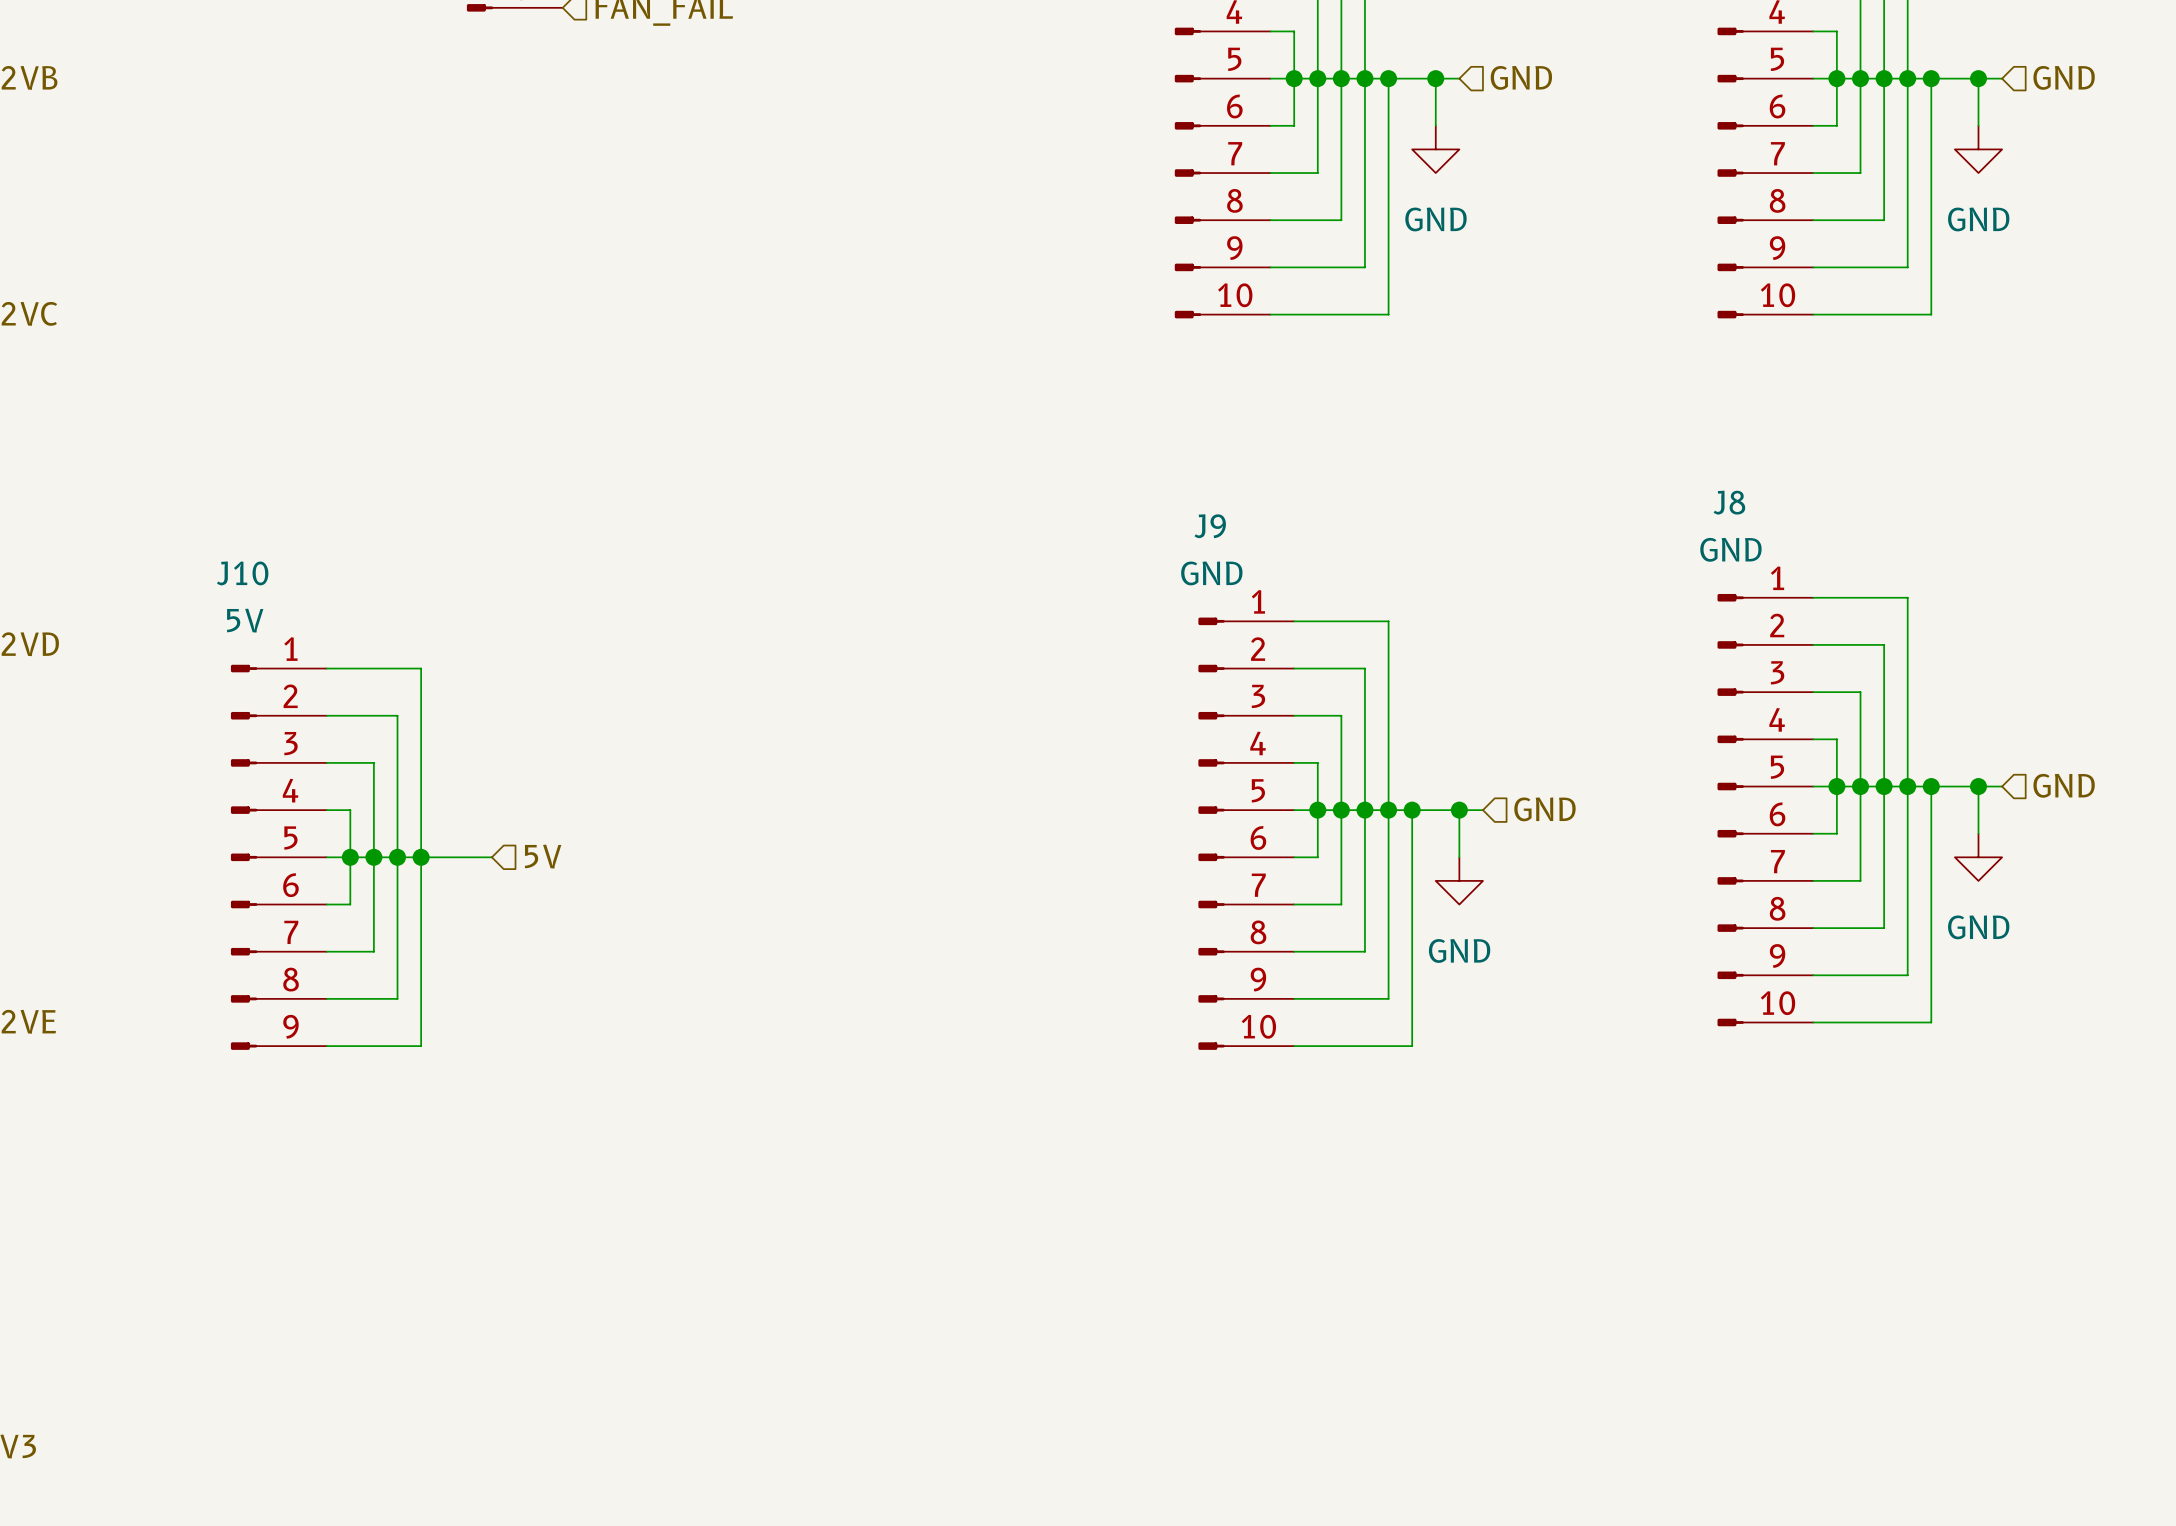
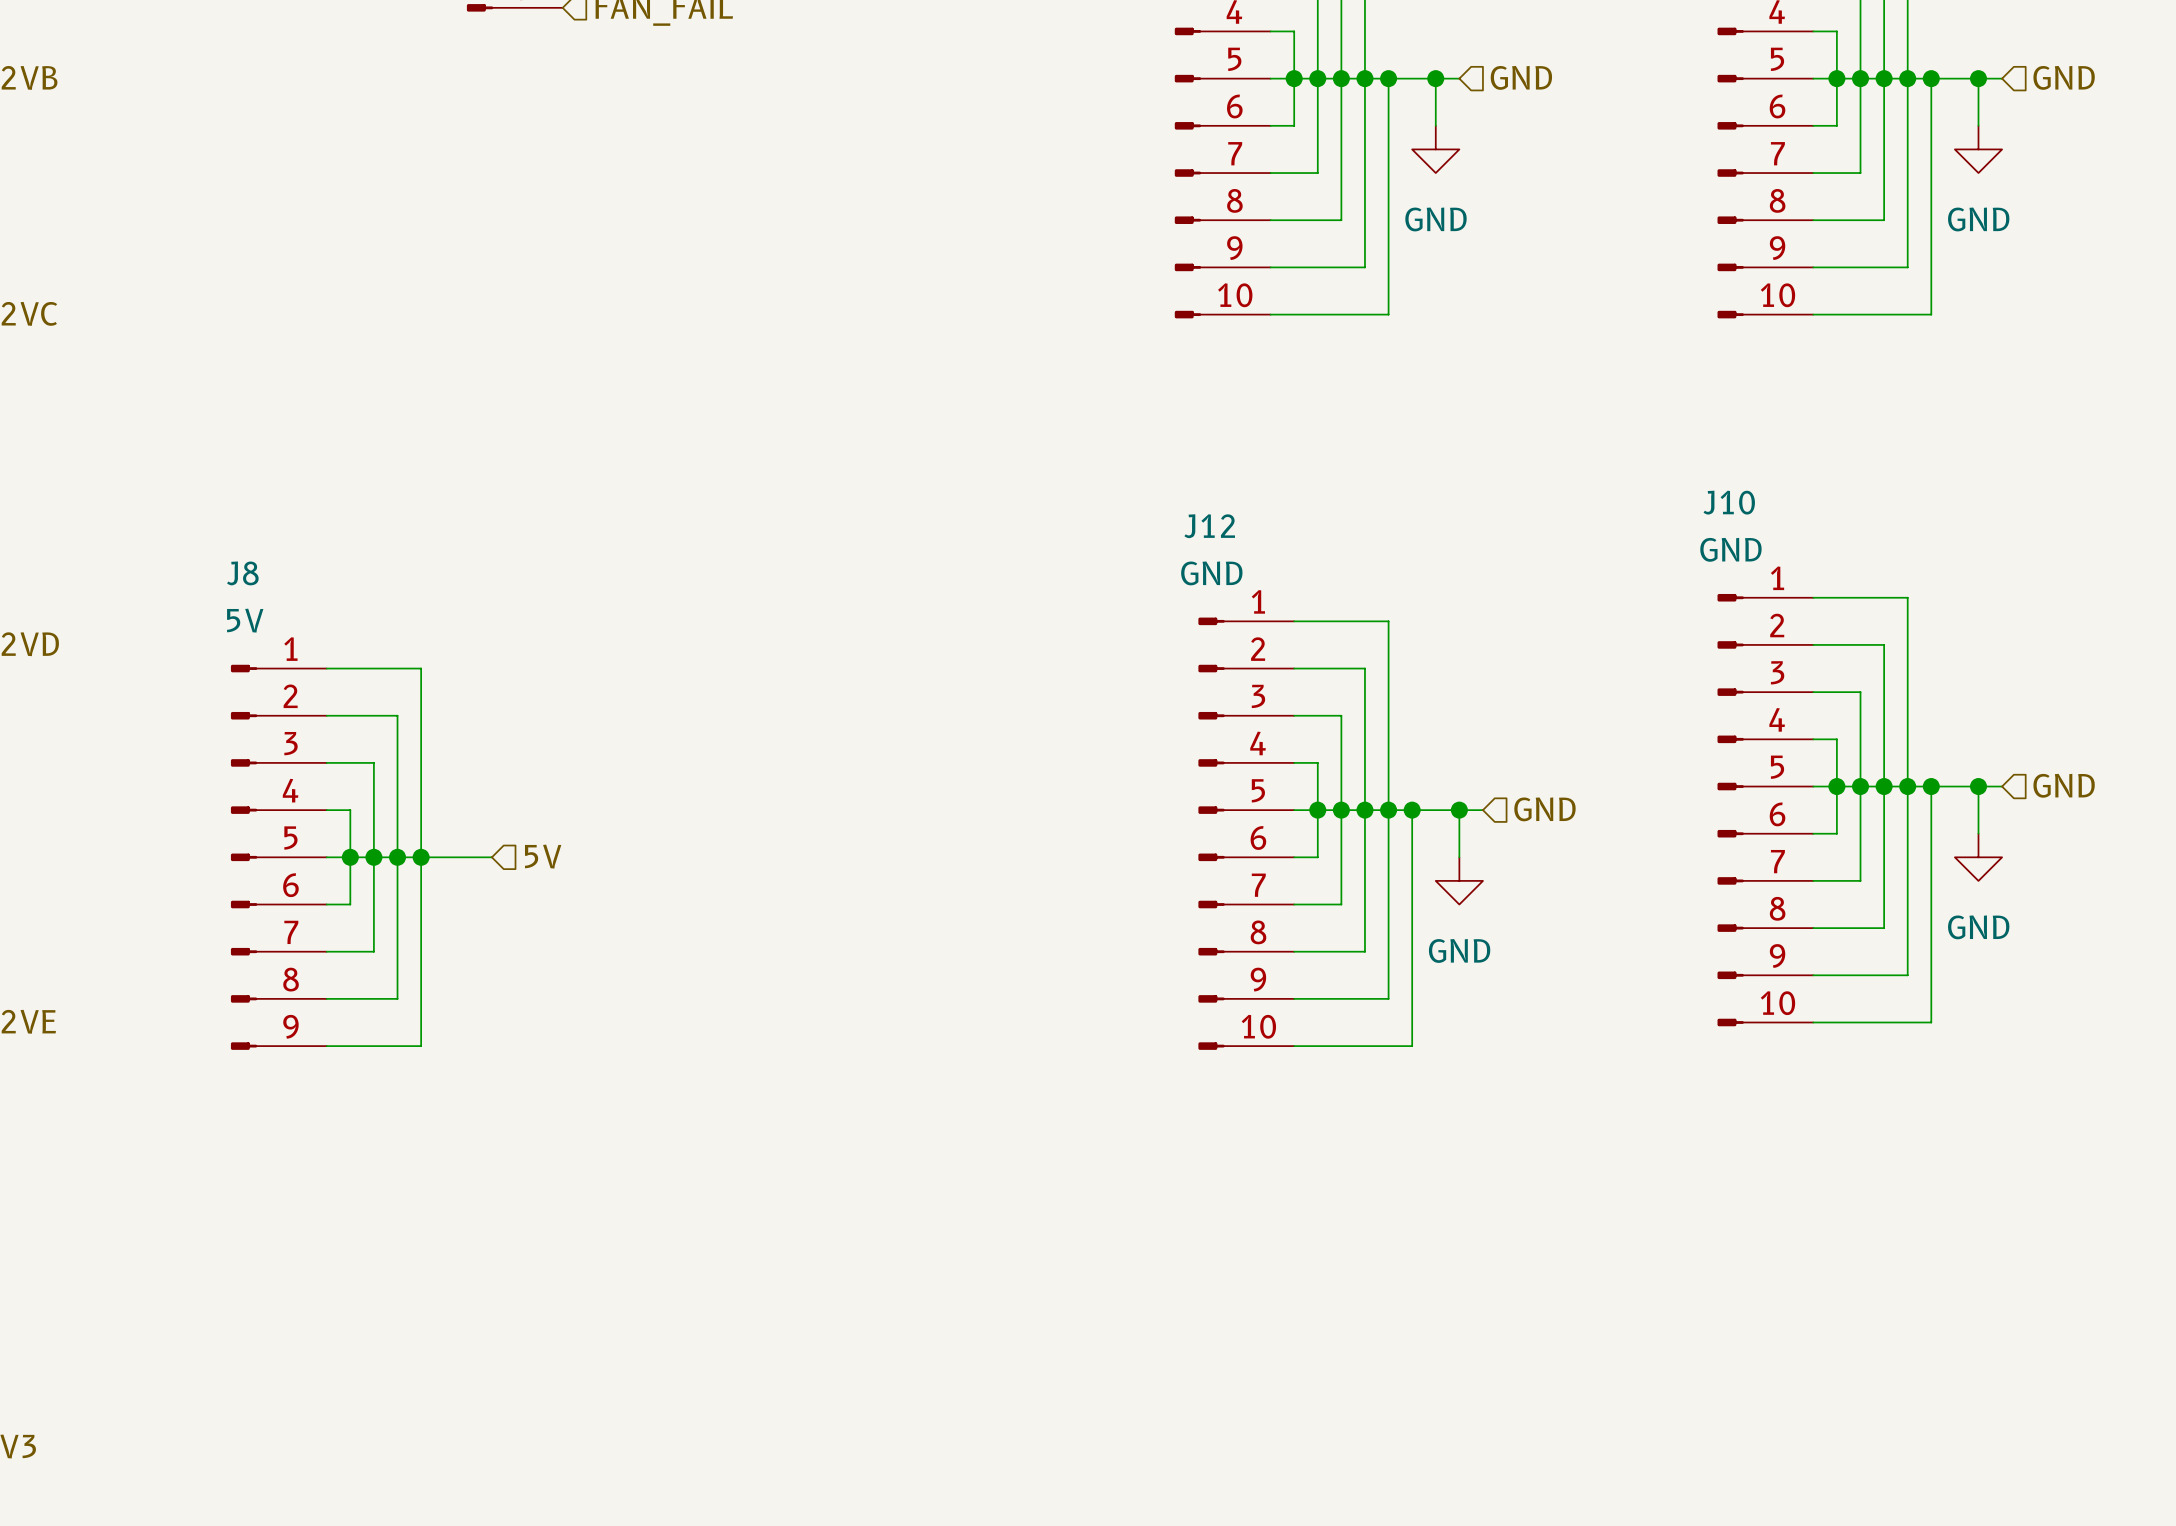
J8 name: J8 (1729, 502) -> J10 (1729, 502)
J9 name: J9 (1210, 526) -> J12 (1209, 526)
J10 name: J10 (242, 573) -> J8 (242, 573)

